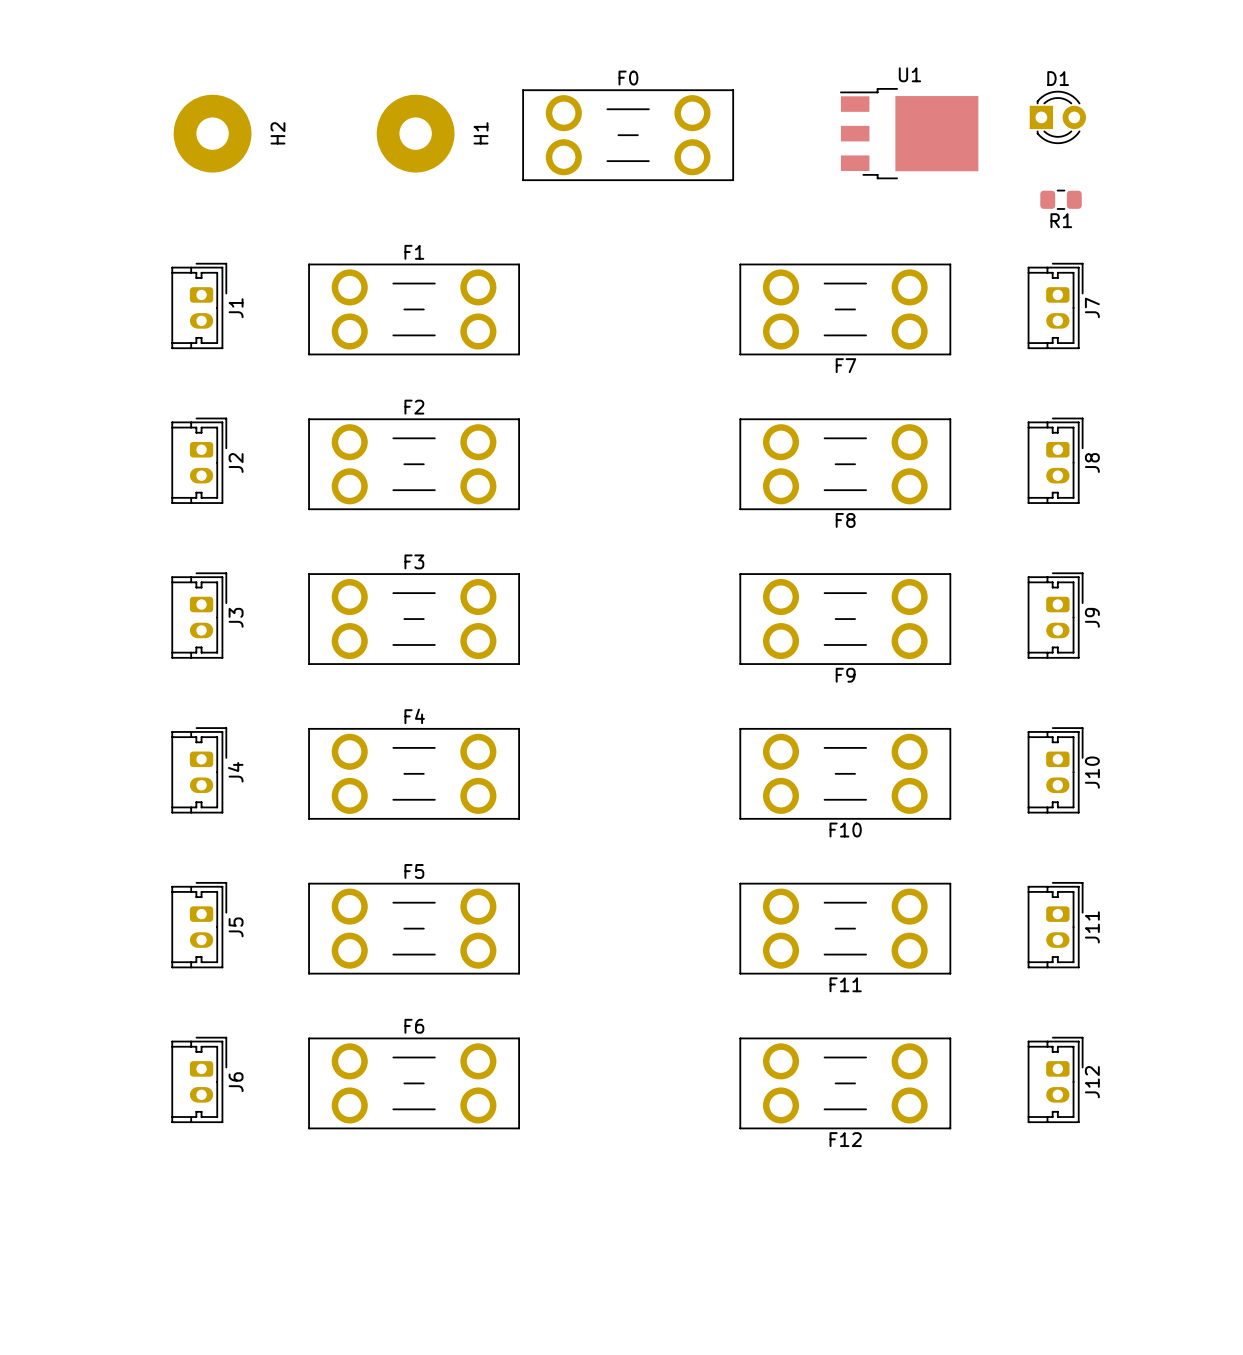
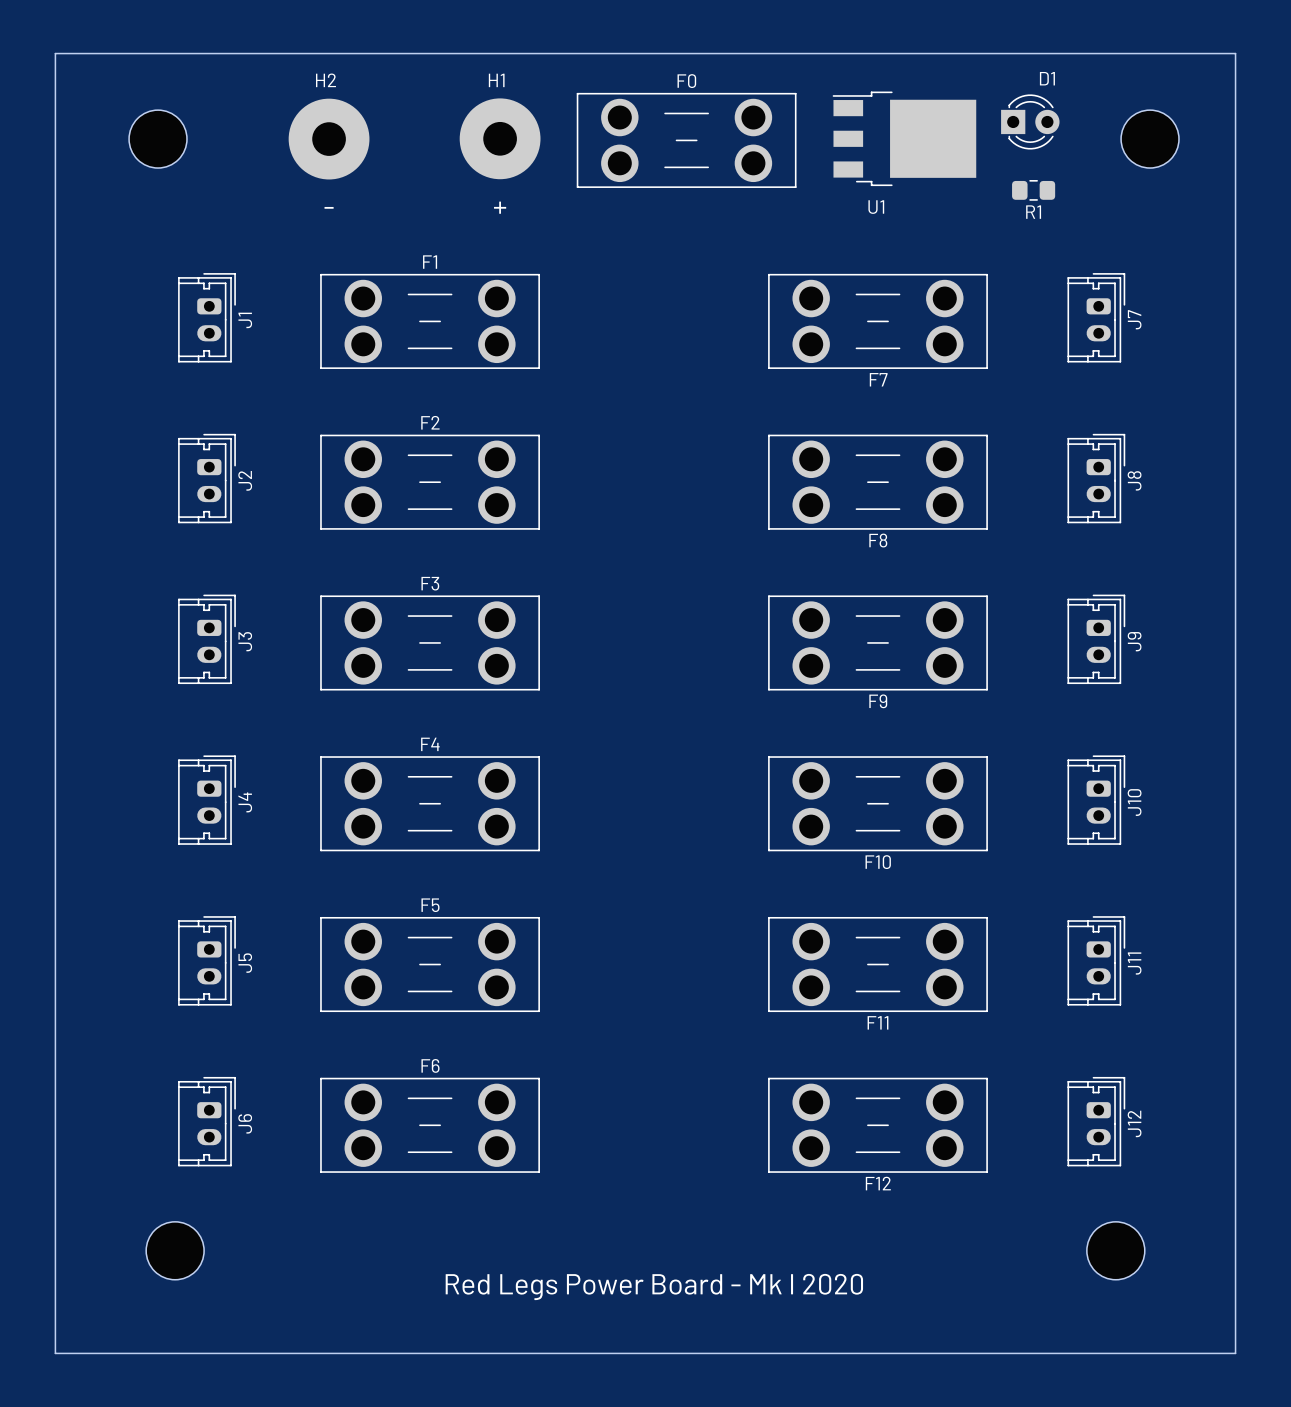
board edge: none -> (55, 53) (1235, 53) (1235, 1353) (55, 1353) (55, 53)
U1 name position: U1 (909, 74) -> U1 (876, 207)
D1 name position: D1 (1058, 78) -> D1 (1047, 78)
D1 position: (1057, 117) -> (1030, 121)
part: none -> (158, 139)
H2 position: (212, 133) -> (329, 139)
H2 name rotation: 0° (277, 133) -> 90° clockwise (325, 80)
H2 name position: H2 (277, 133) -> H2 (325, 80)
H1 position: (415, 133) -> (500, 138)
H1 name rotation: 0° (481, 133) -> 90° clockwise (496, 80)
H1 name position: H1 (481, 133) -> H1 (496, 80)
U1 position: (909, 133) -> (904, 138)
part: none -> (1150, 139)
F0 position: (628, 135) -> (686, 140)
R1 position: (1061, 199) -> (1033, 190)
text: none -> - (329, 207)
text: none -> + (500, 207)
part: none -> (175, 1250)
part: none -> (1115, 1250)
text: none -> Red Legs Power Board - Mk I 2020 (654, 1286)

